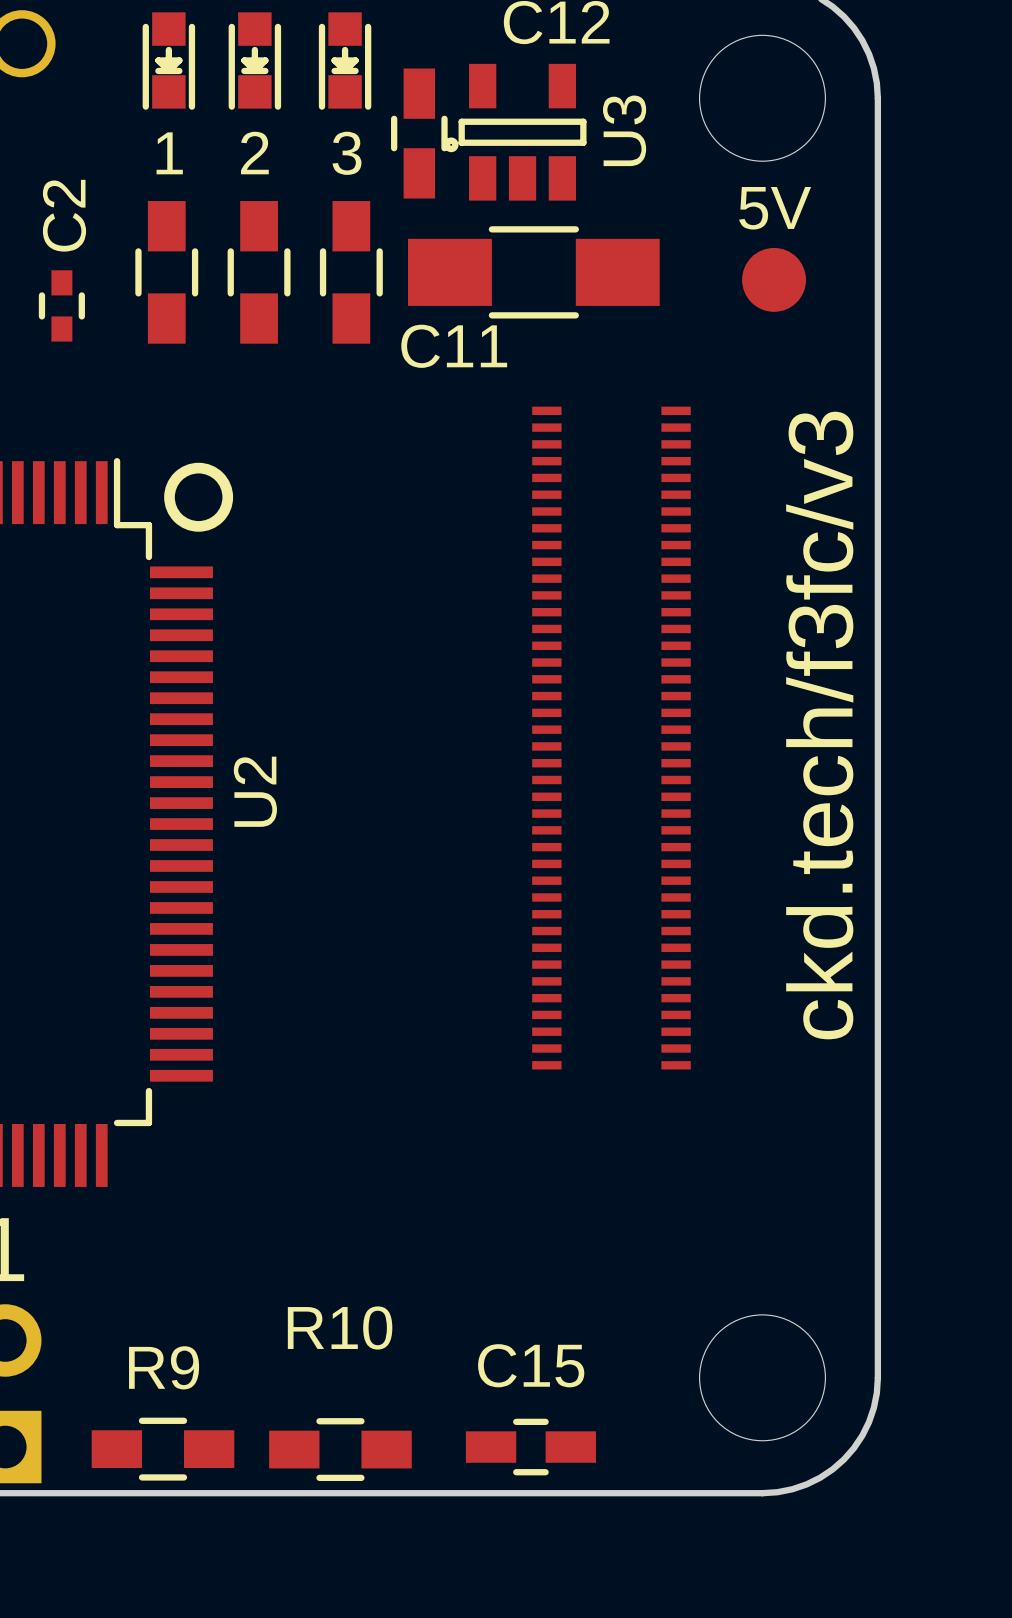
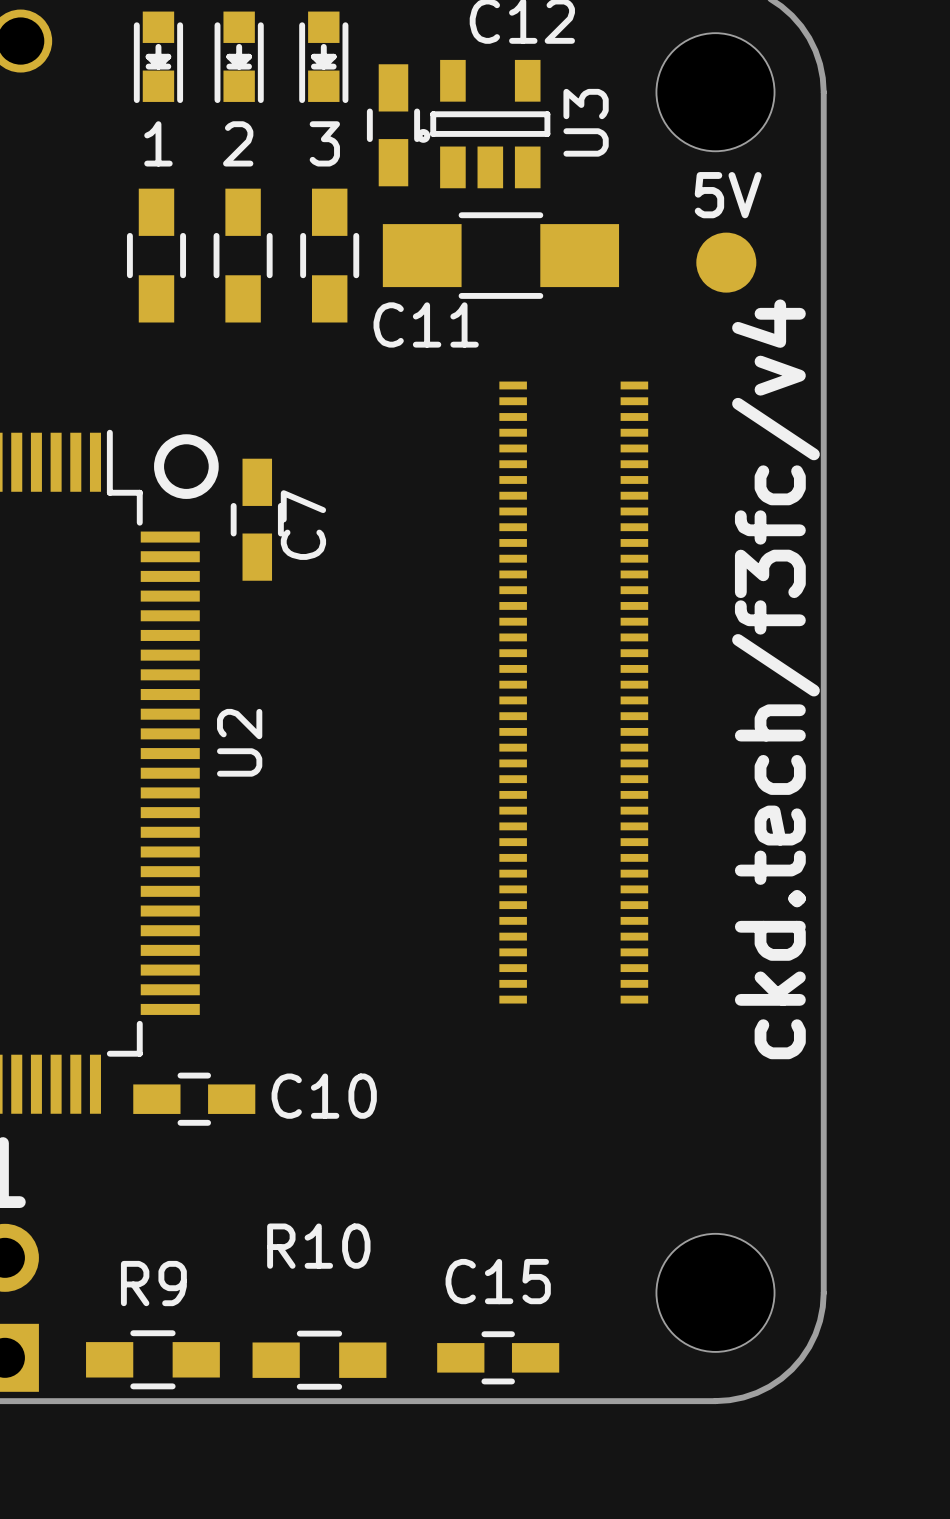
C2: (61, 305) -> none
C7: none -> (257, 519)
text: ckd.tech/f3fc/v3 (819, 725) -> ckd.tech/f3fc/v4 (775, 679)
C10: none -> (194, 1099)

